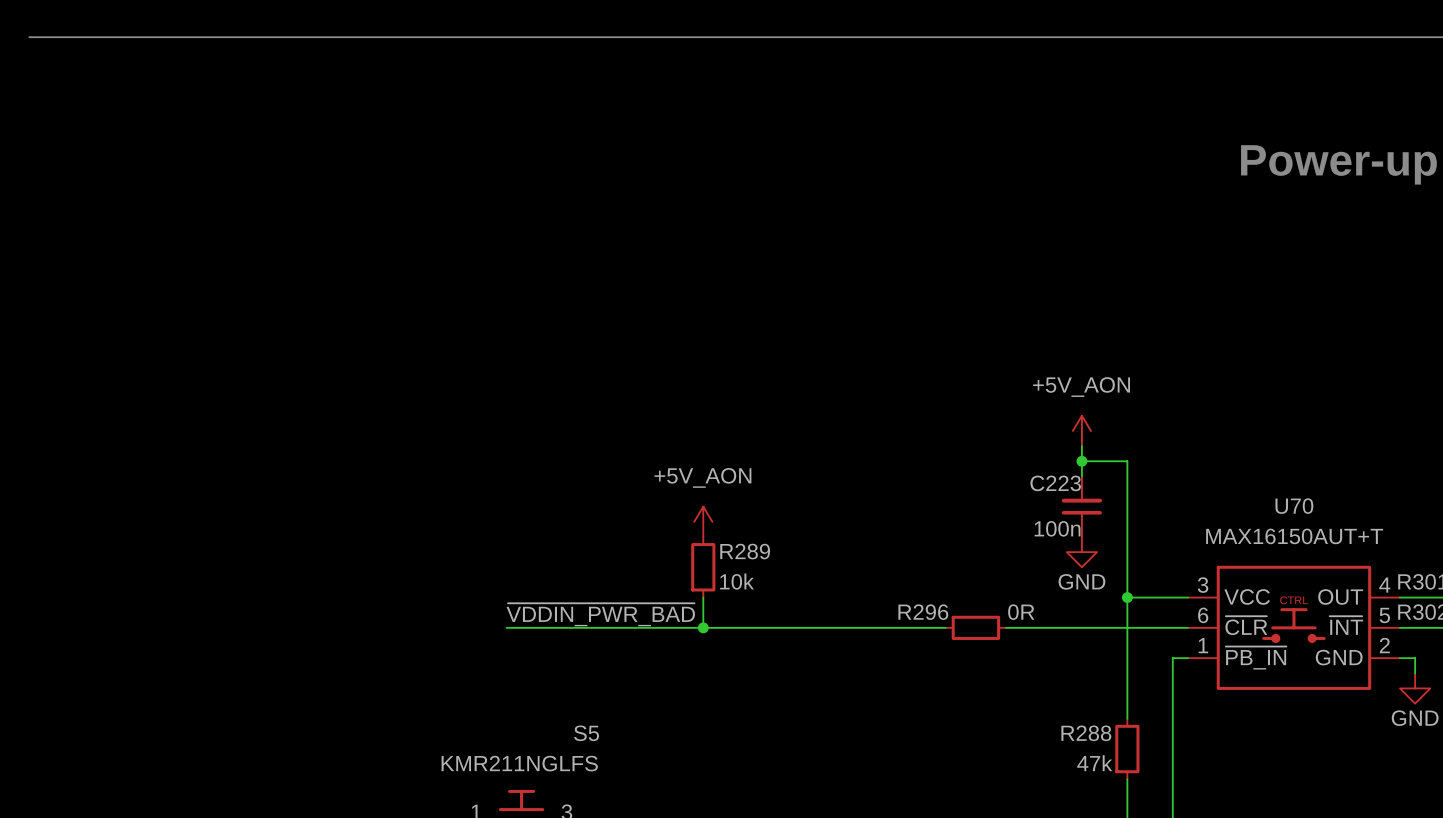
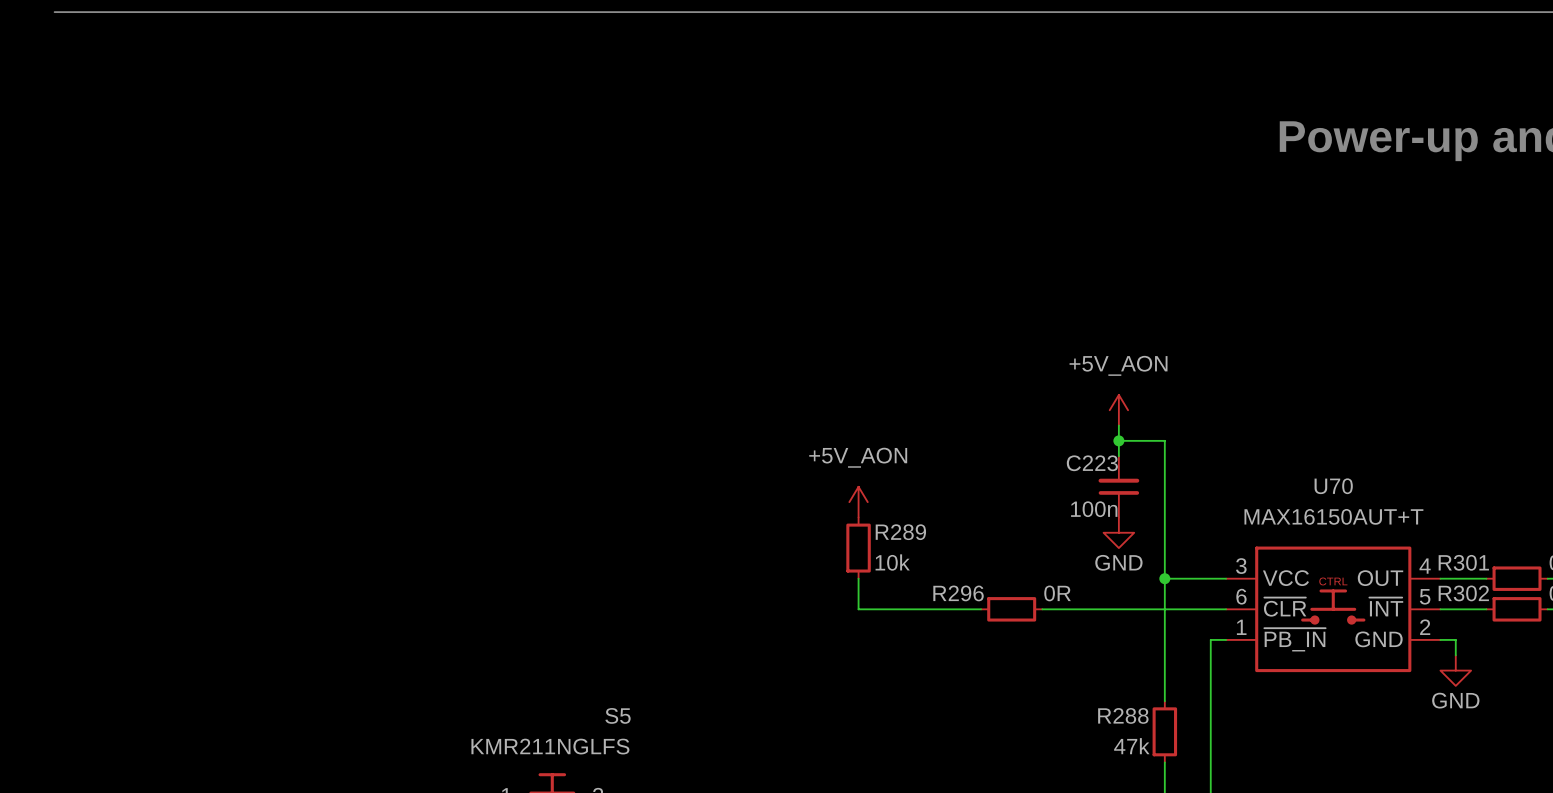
power symbol position: +5V_AON (703, 521) -> +5V_AON (858, 502)
R289 position: (703, 567) -> (858, 548)
wire: (703, 597) (703, 627) -> none
label: ~{VDDIN_PWR_BAD} (600, 614) -> none
wire: (506, 627) (824, 627) -> (858, 578) (858, 609)
junction: (703, 627) -> none

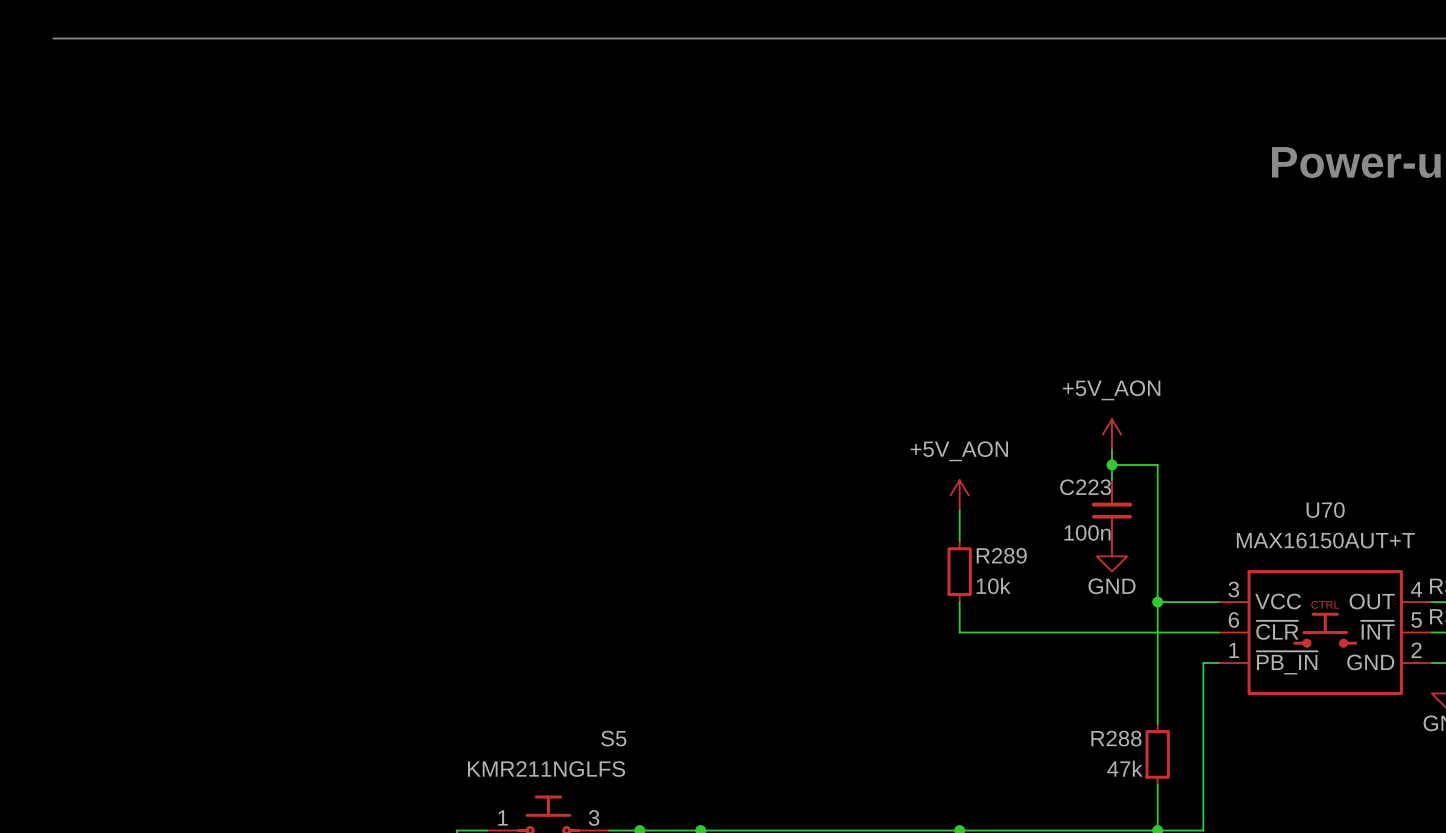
wire: none -> (959, 510) (959, 541)
power symbol position: +5V_AON (858, 502) -> +5V_AON (959, 495)
R289 position: (858, 548) -> (959, 571)
wire: (858, 578) (858, 609) (965, 609) -> (959, 602) (959, 632)
wire: none -> (974, 632) (1035, 632)
R296: (1011, 609) -> none

